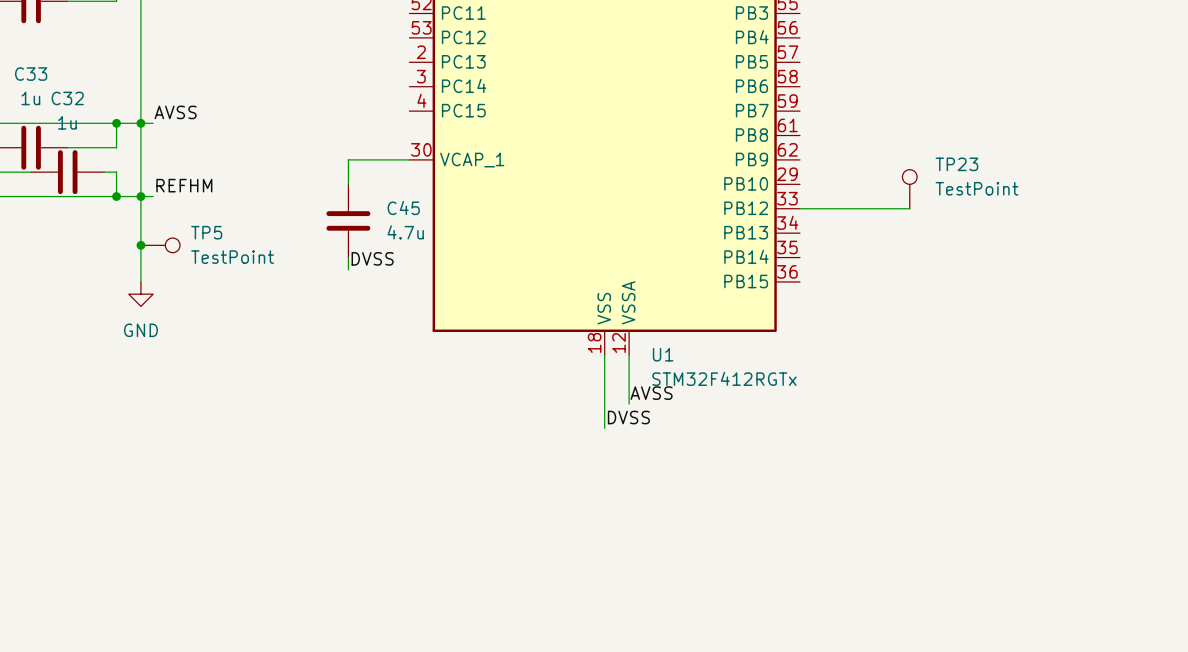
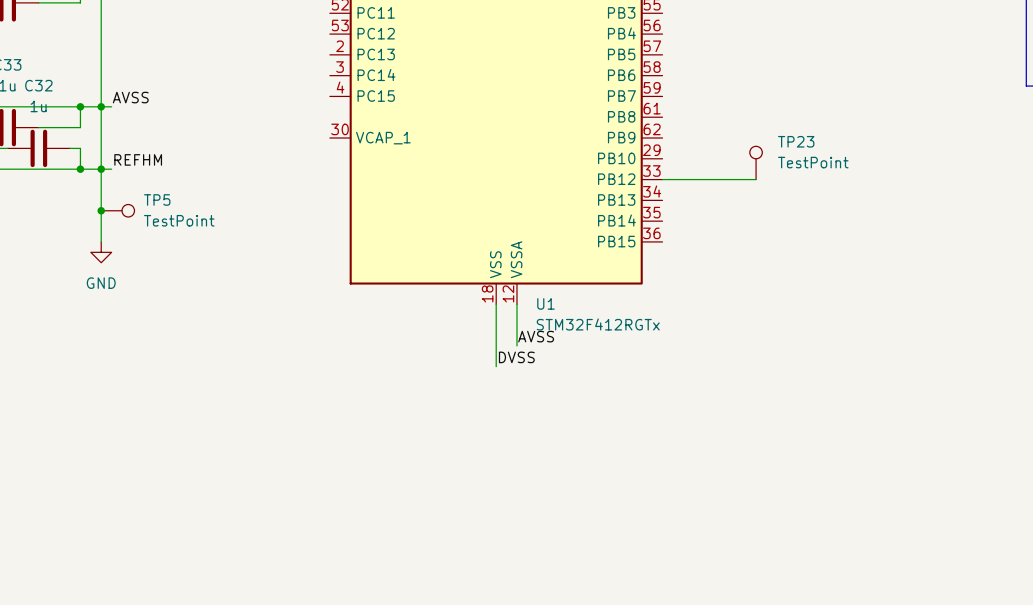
wire: (409, 159) (348, 159) (348, 184) -> none
C45: 4.7u (348, 220) -> none
wire: (348, 257) (348, 269) -> none
label: DVSS (372, 258) -> none

